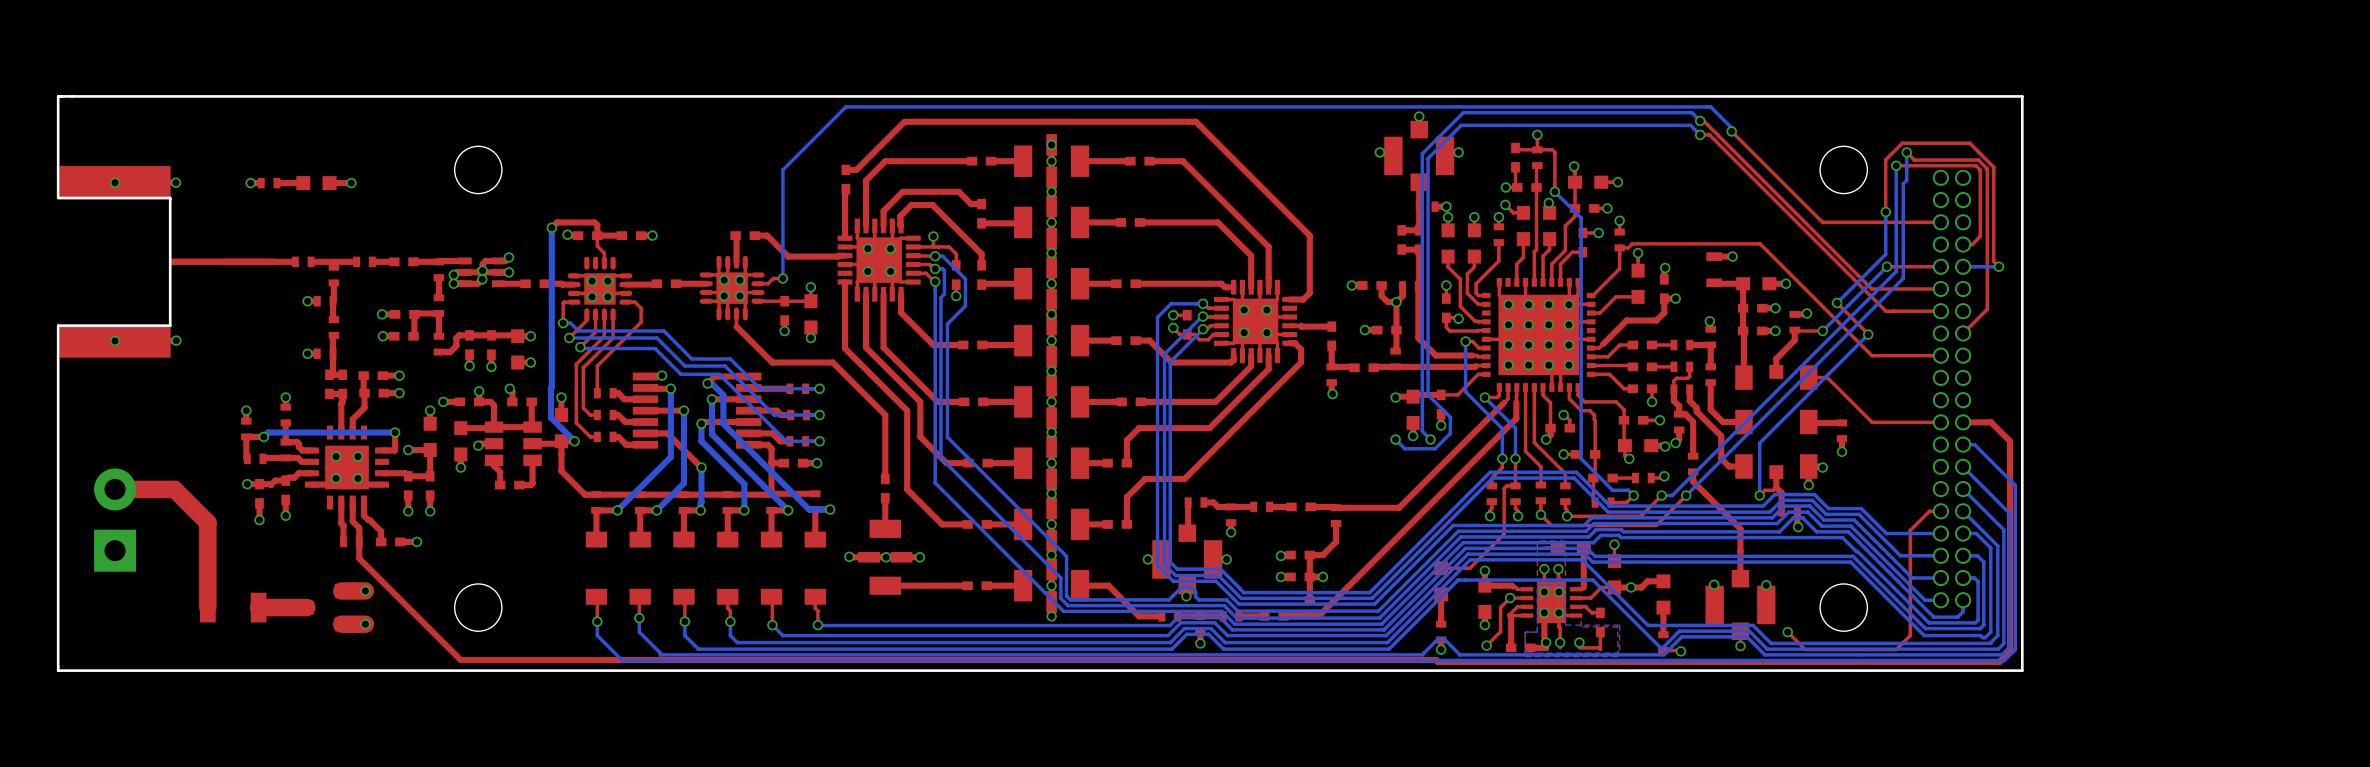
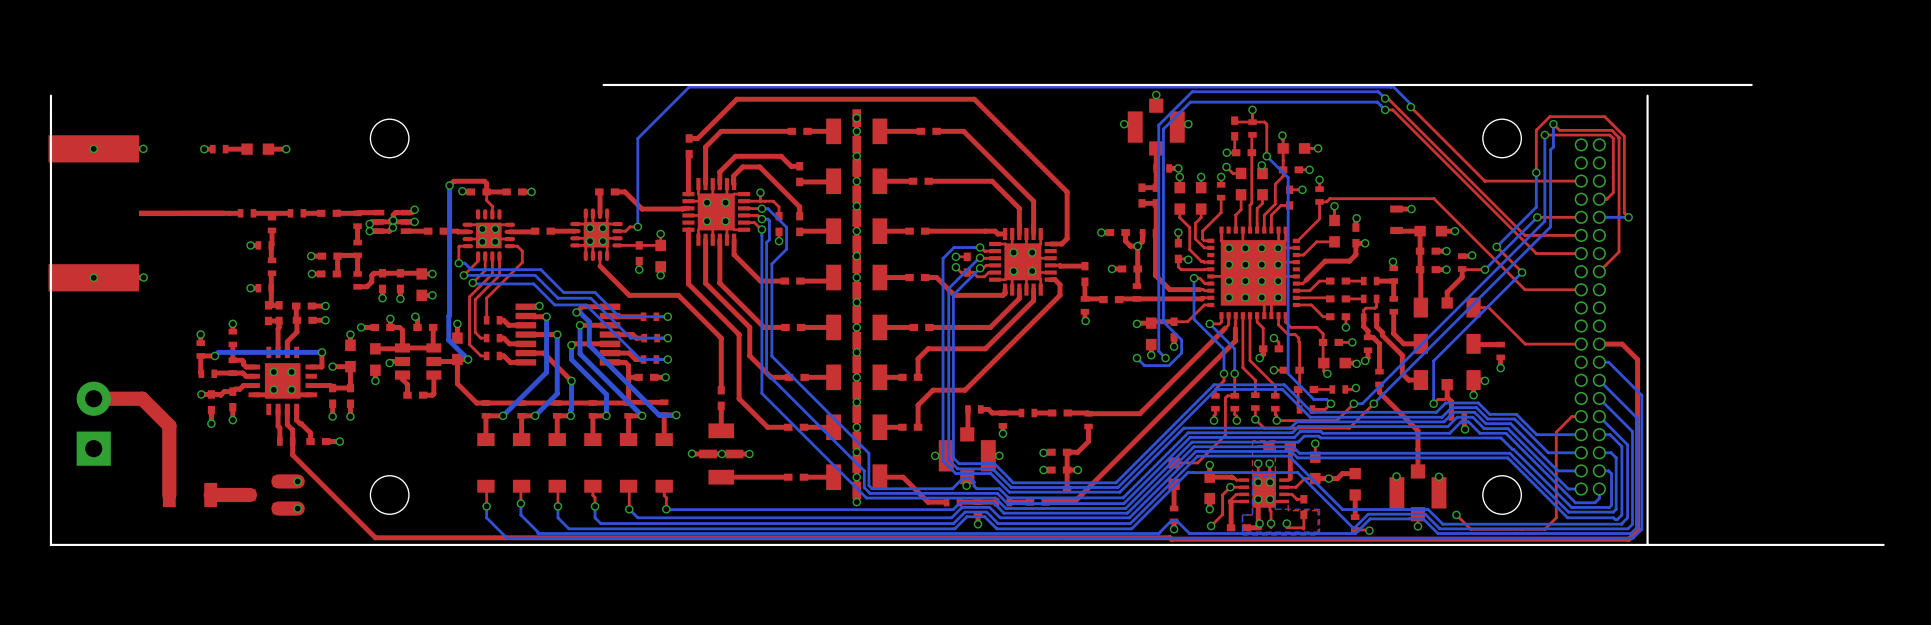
board edge: none -> (1751, 84) (603, 84)
board edge: none -> (50, 95) (50, 544) (1883, 544)
board edge: (2022, 117) (2022, 96) (58, 96) (58, 197) (170, 197) (170, 325) (58, 325) (58, 670) (2022, 670) (2022, 668) -> none

